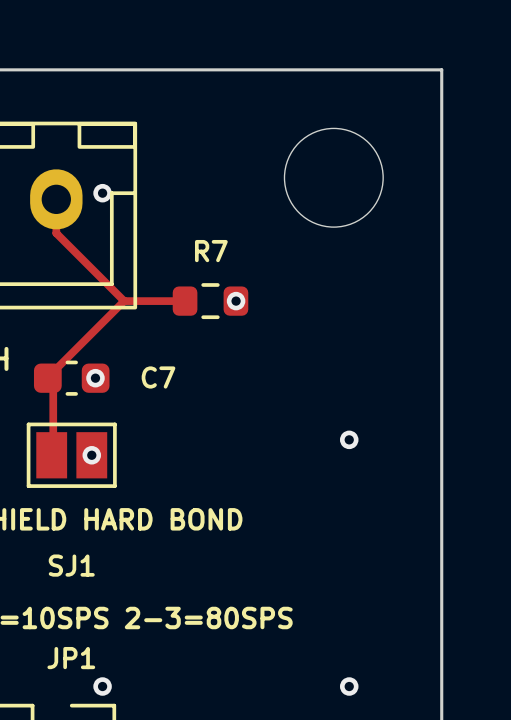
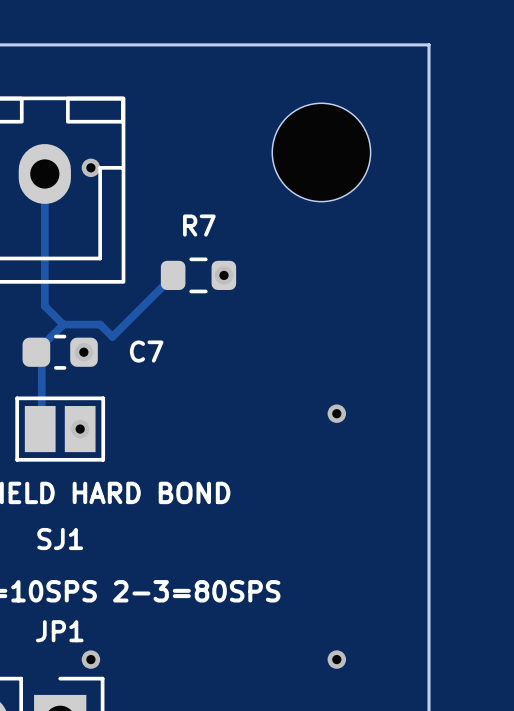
track: (56, 233) (124, 301) -> (44, 207) (44, 306) (63, 324) (100, 324) (112, 336) (173, 275)
track: (124, 301) (185, 301) -> none
track: (124, 301) (74, 350) -> none

